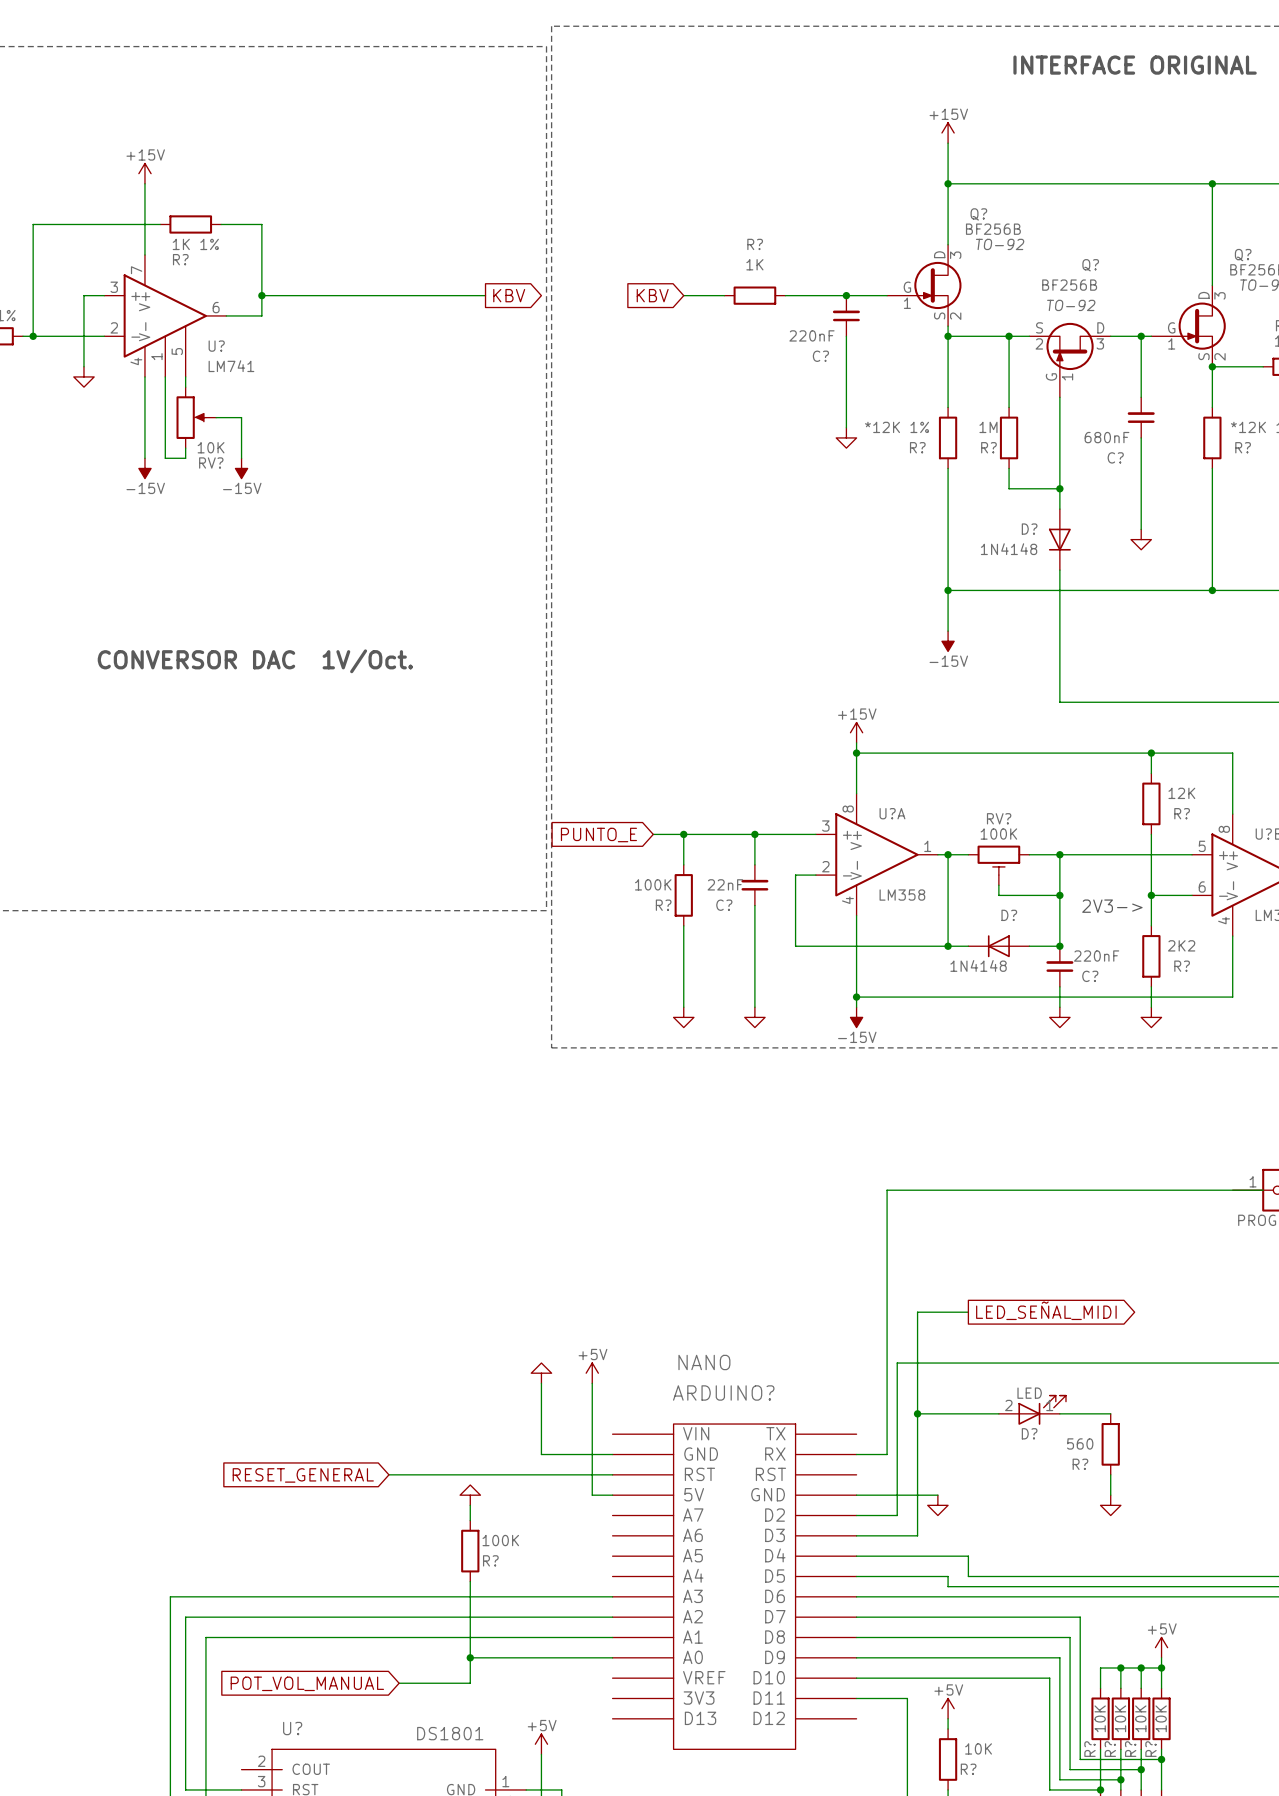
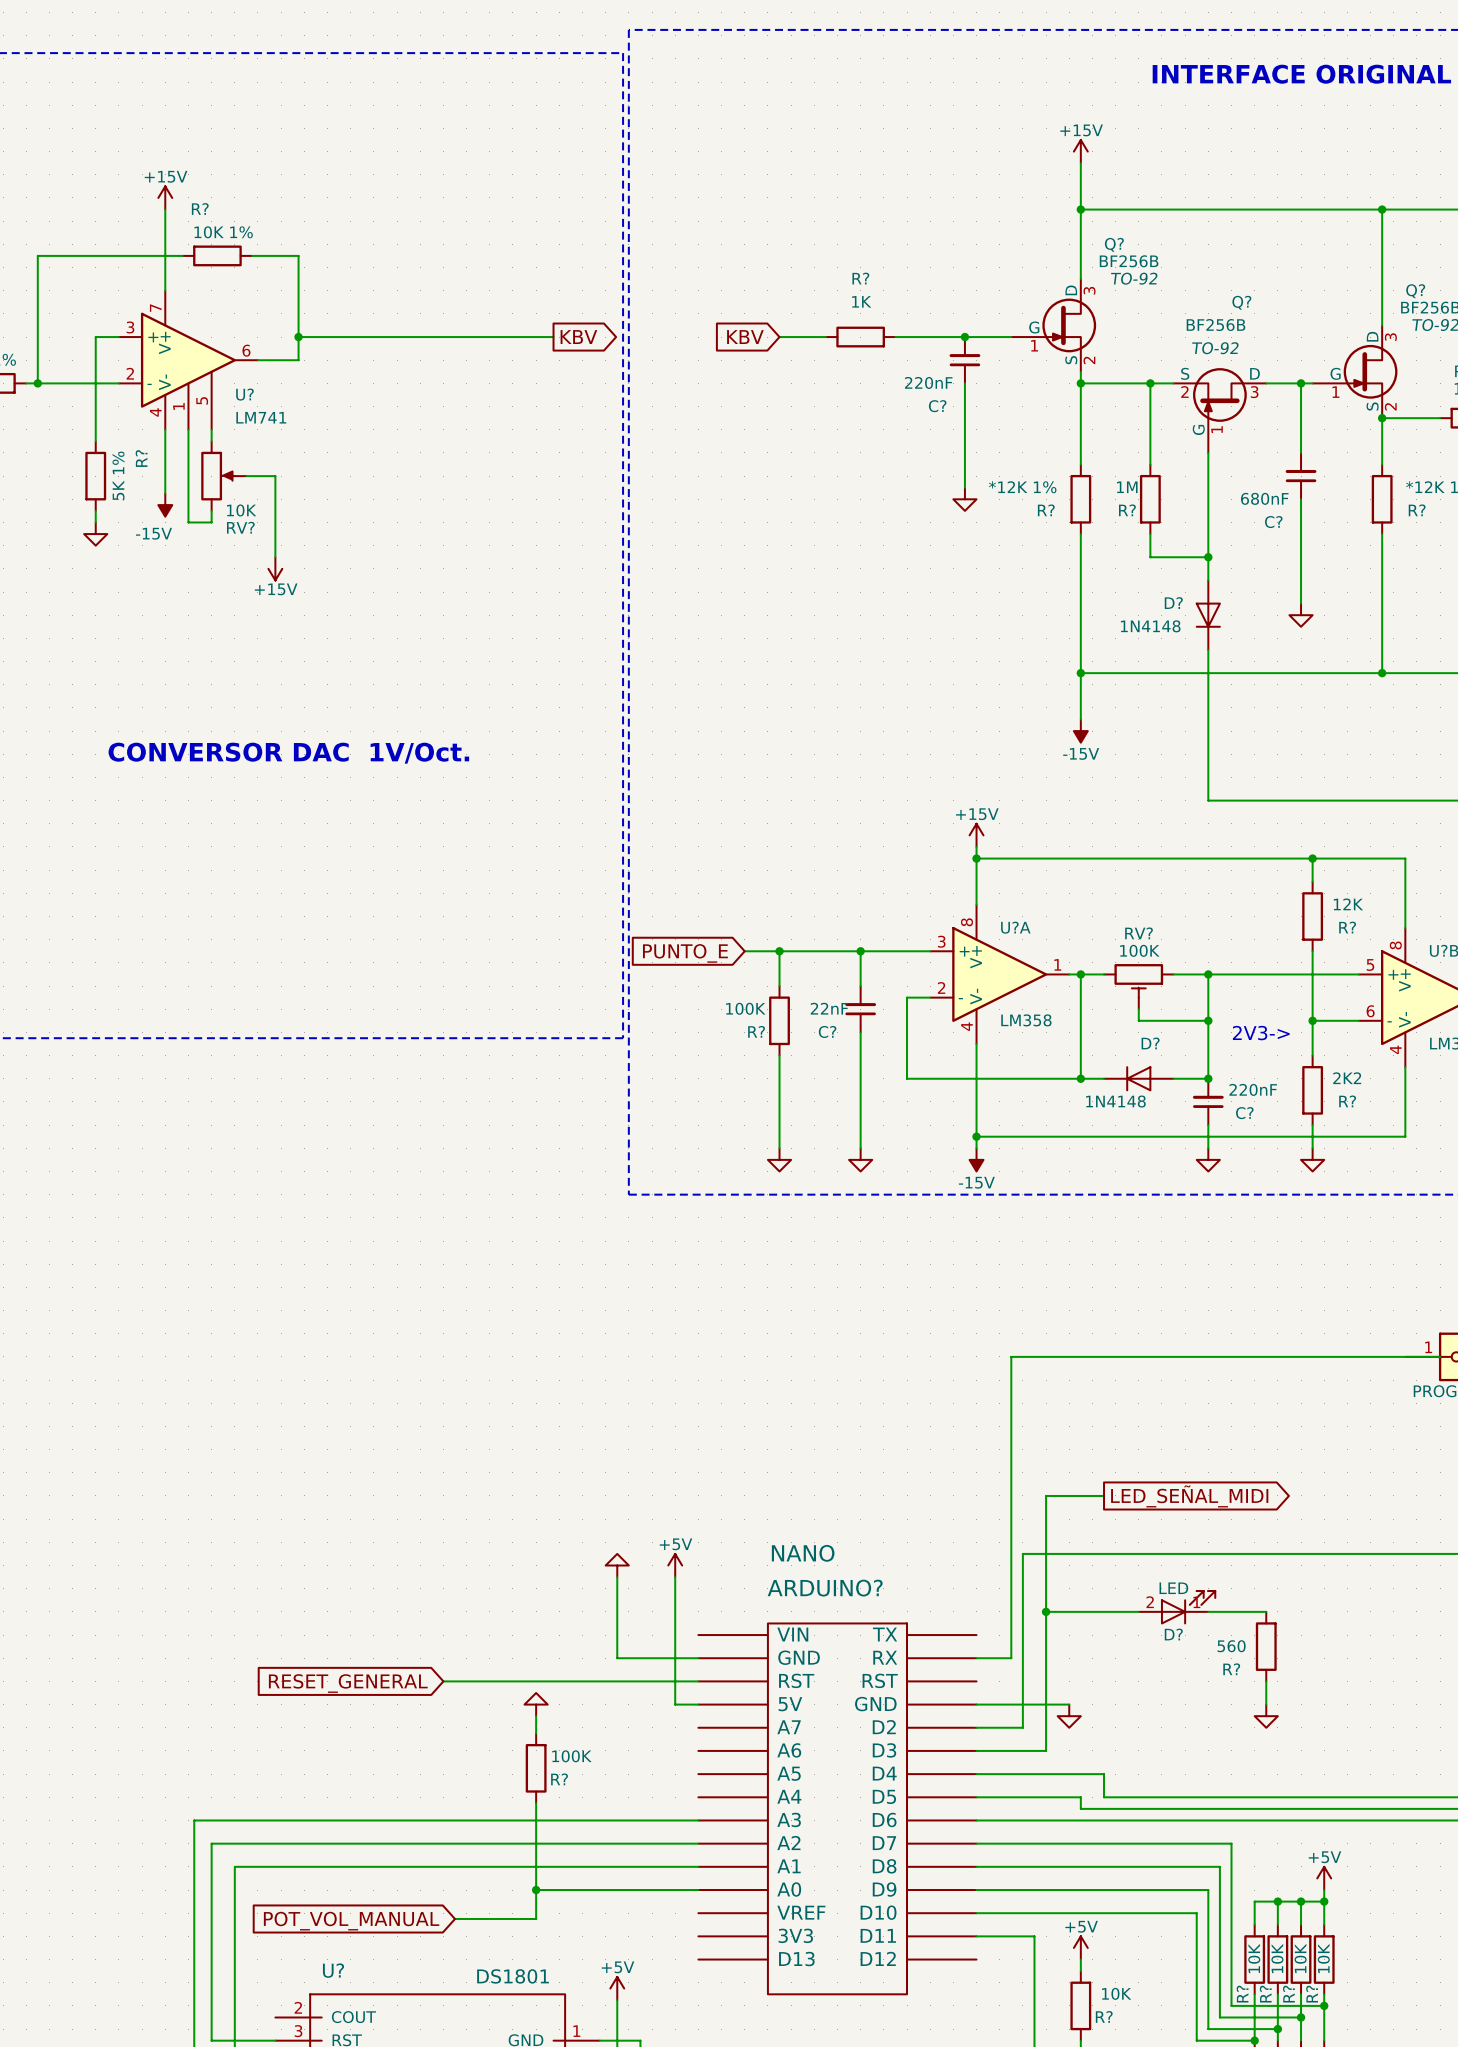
R? value: 1K 1% (195, 244) -> 10K 1% (223, 232)
R? name position: R? (180, 259) -> R? (200, 209)
power symbol position: (83, 376) -> (95, 534)
R?: none -> 5K 1% (95, 476)
wire: none -> (95, 510) (95, 522)
power symbol position: -15V (144, 468) -> -15V (165, 505)
power symbol: -15V (241, 468) -> none
power symbol text position: -15V (145, 488) -> -15V (154, 533)
power symbol: none -> +15V (275, 568)

